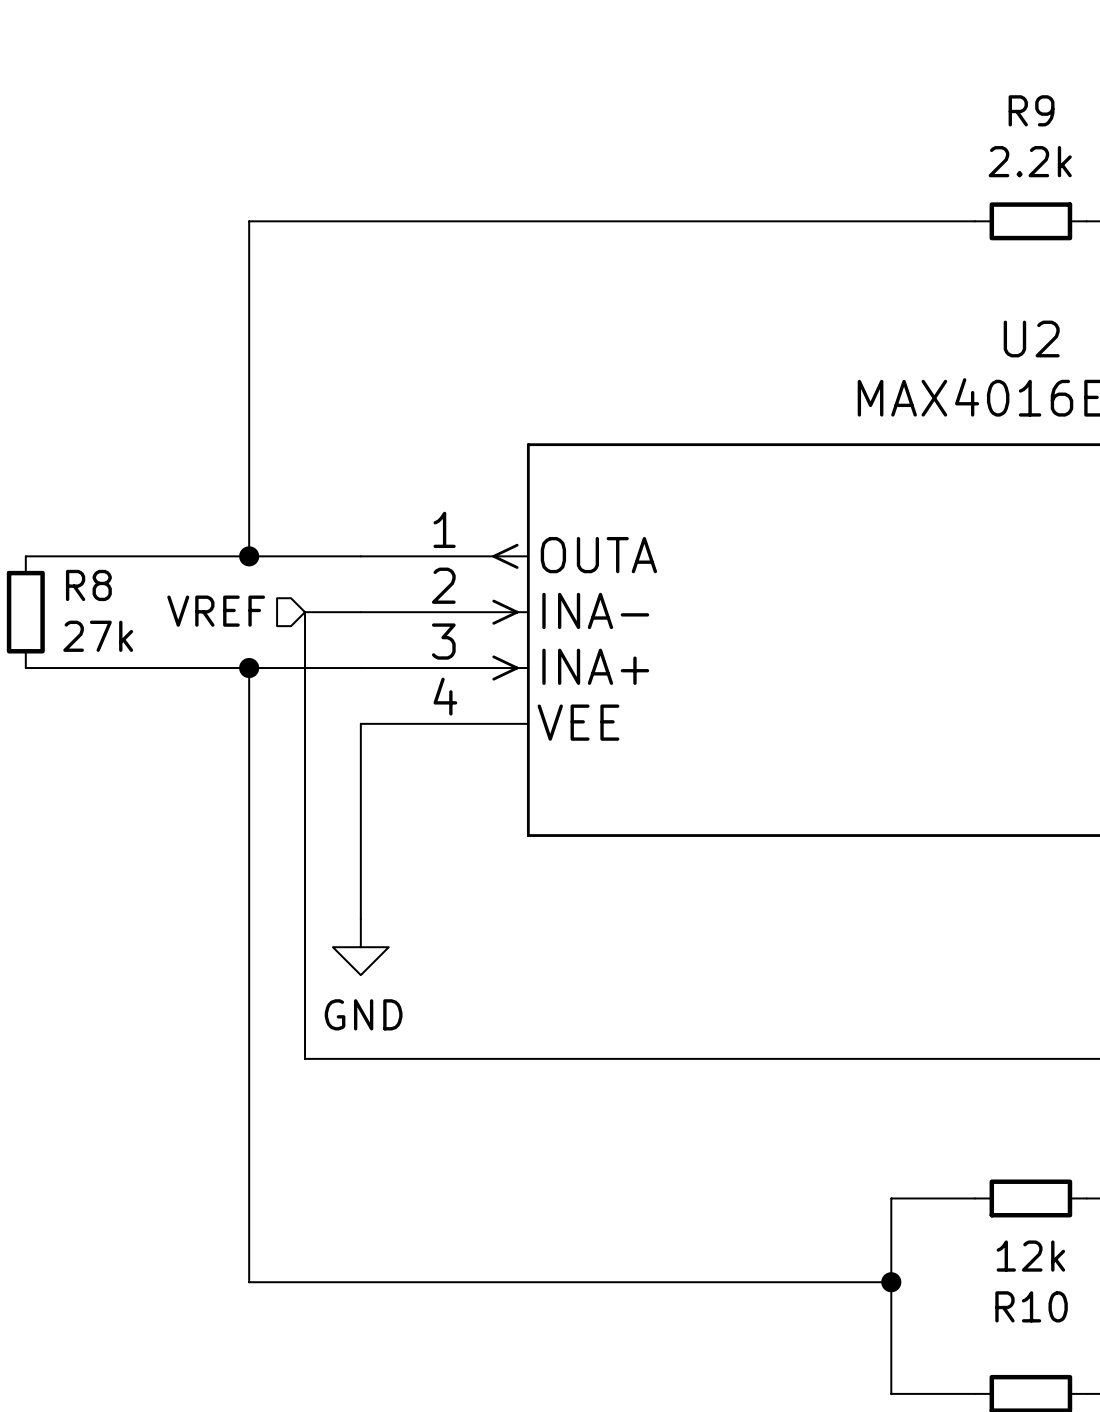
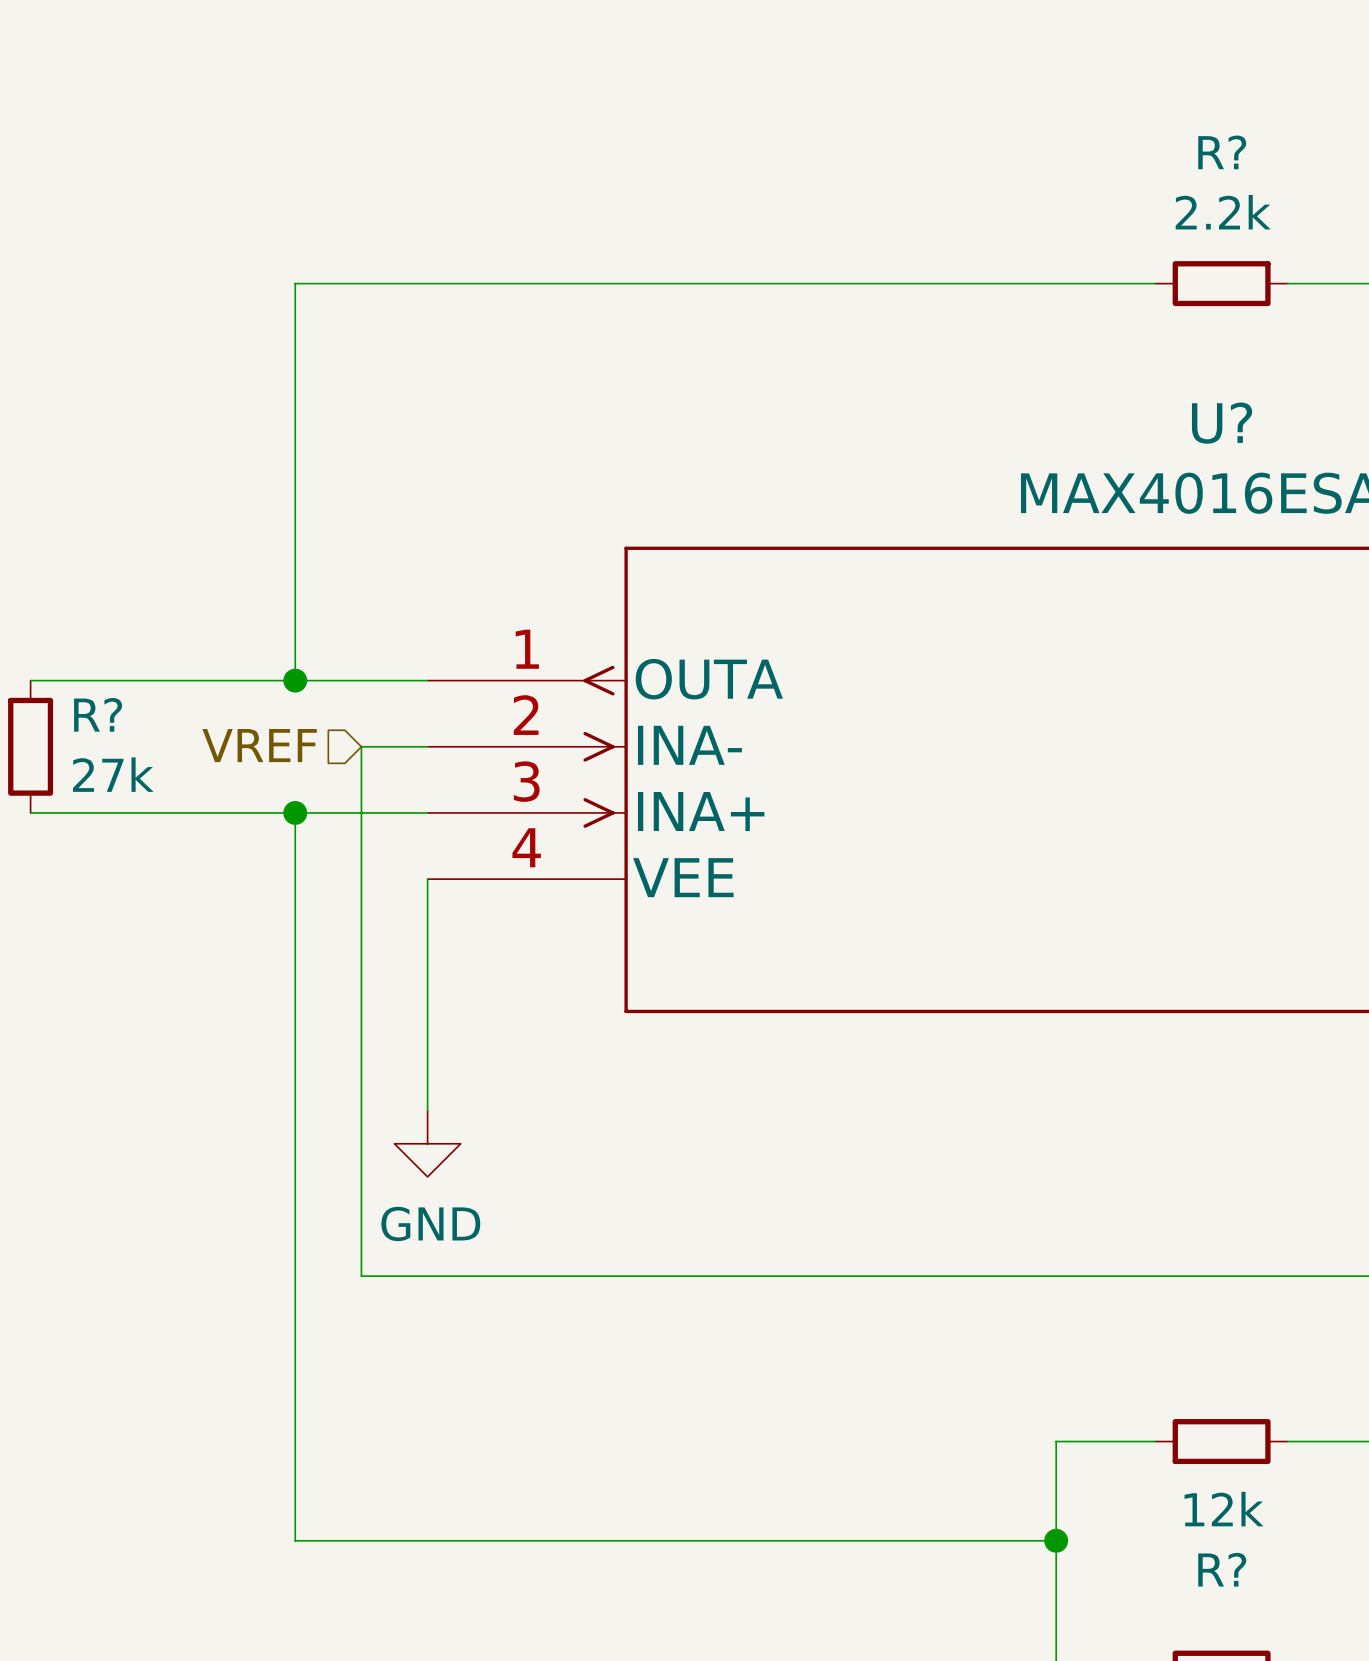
R9 name: R9 (1031, 110) -> R? (1222, 152)
U2 name: U2 (1031, 339) -> U? (1222, 423)
R8 name: R8 (88, 585) -> R? (98, 714)
R10 name: R10 (1031, 1306) -> R? (1222, 1569)

